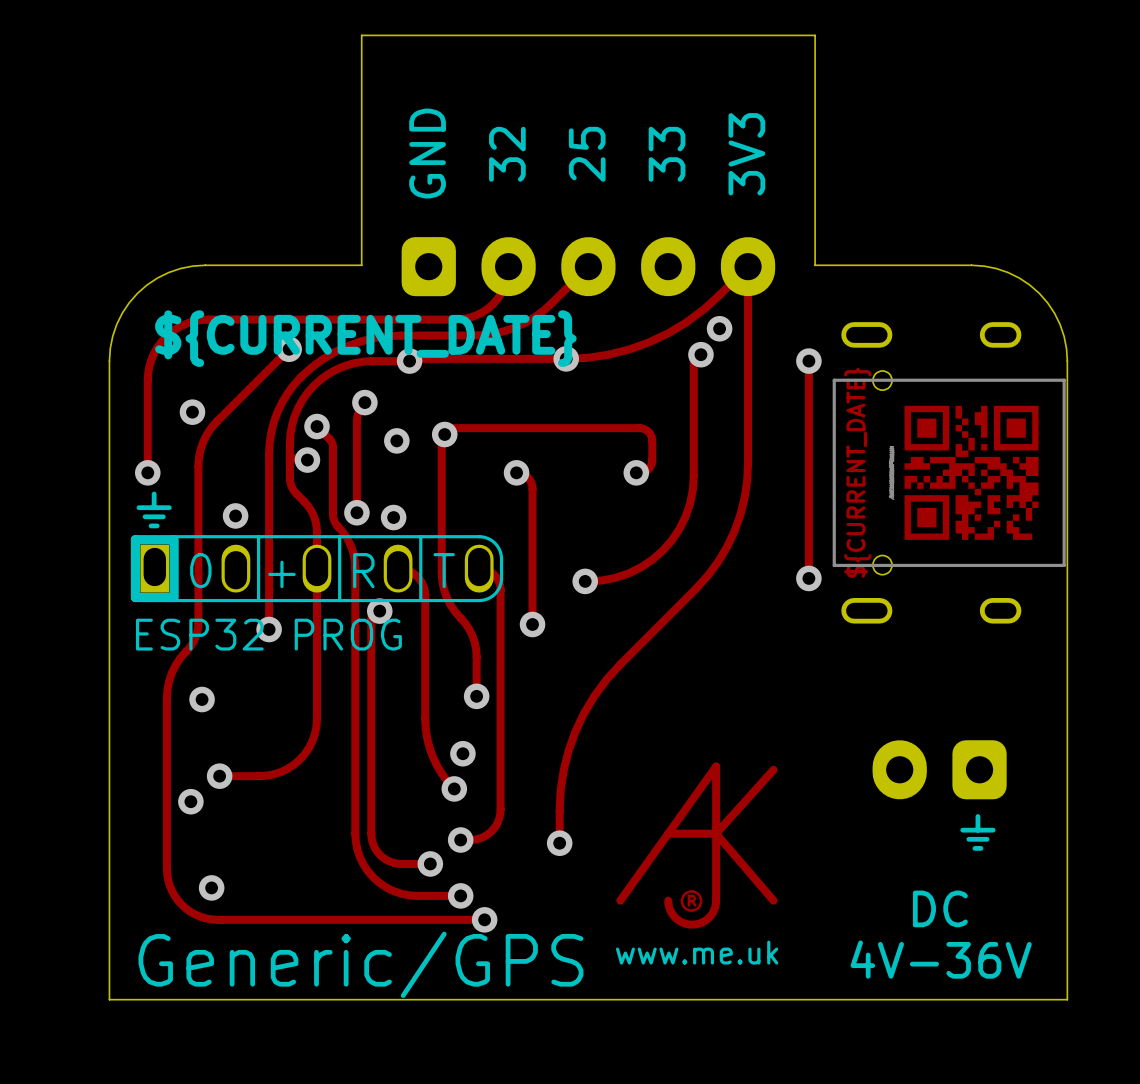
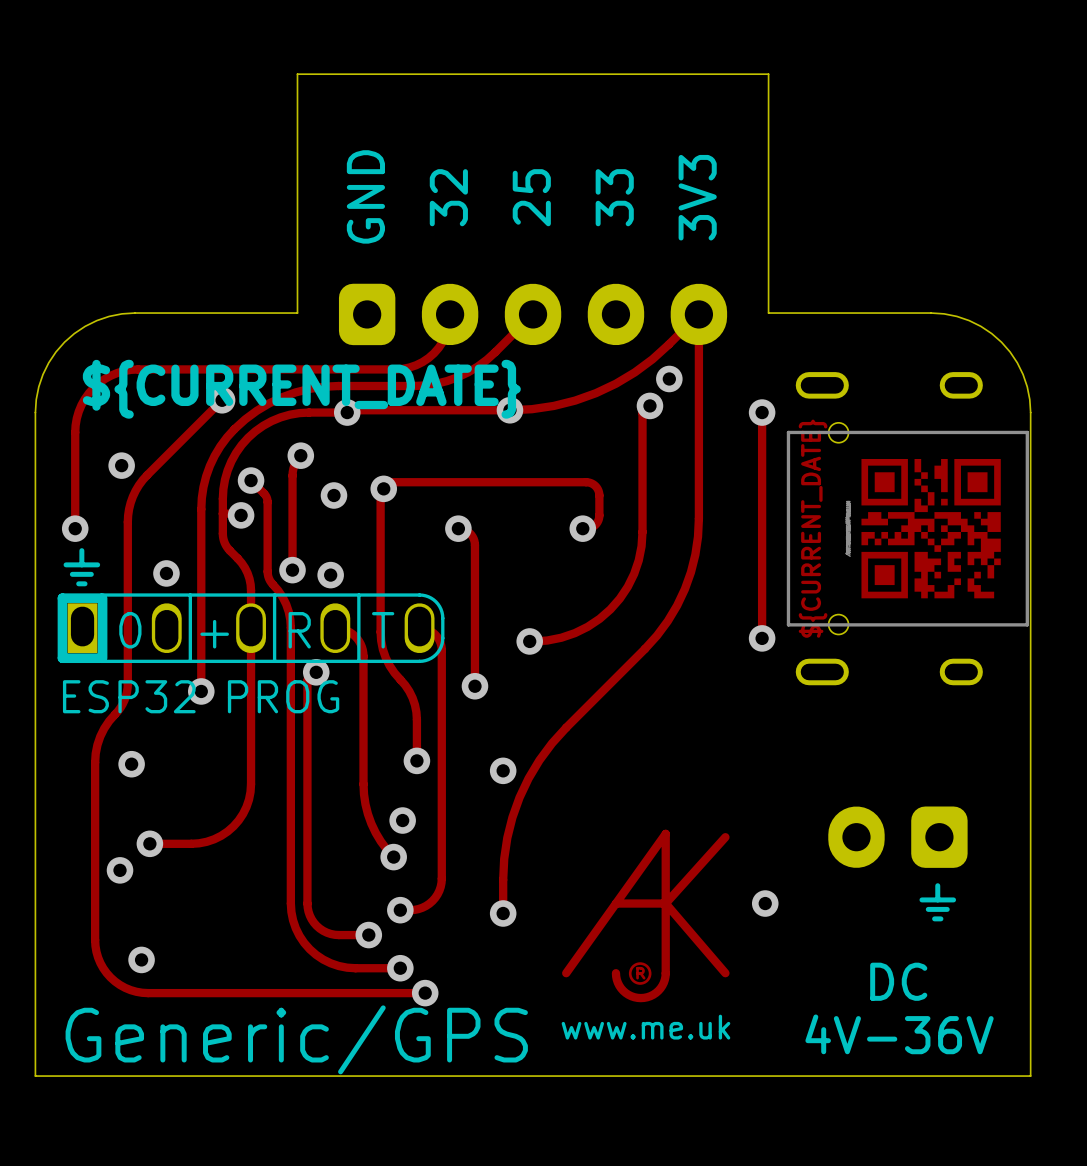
via: none -> (503, 770)
via: none -> (765, 903)

